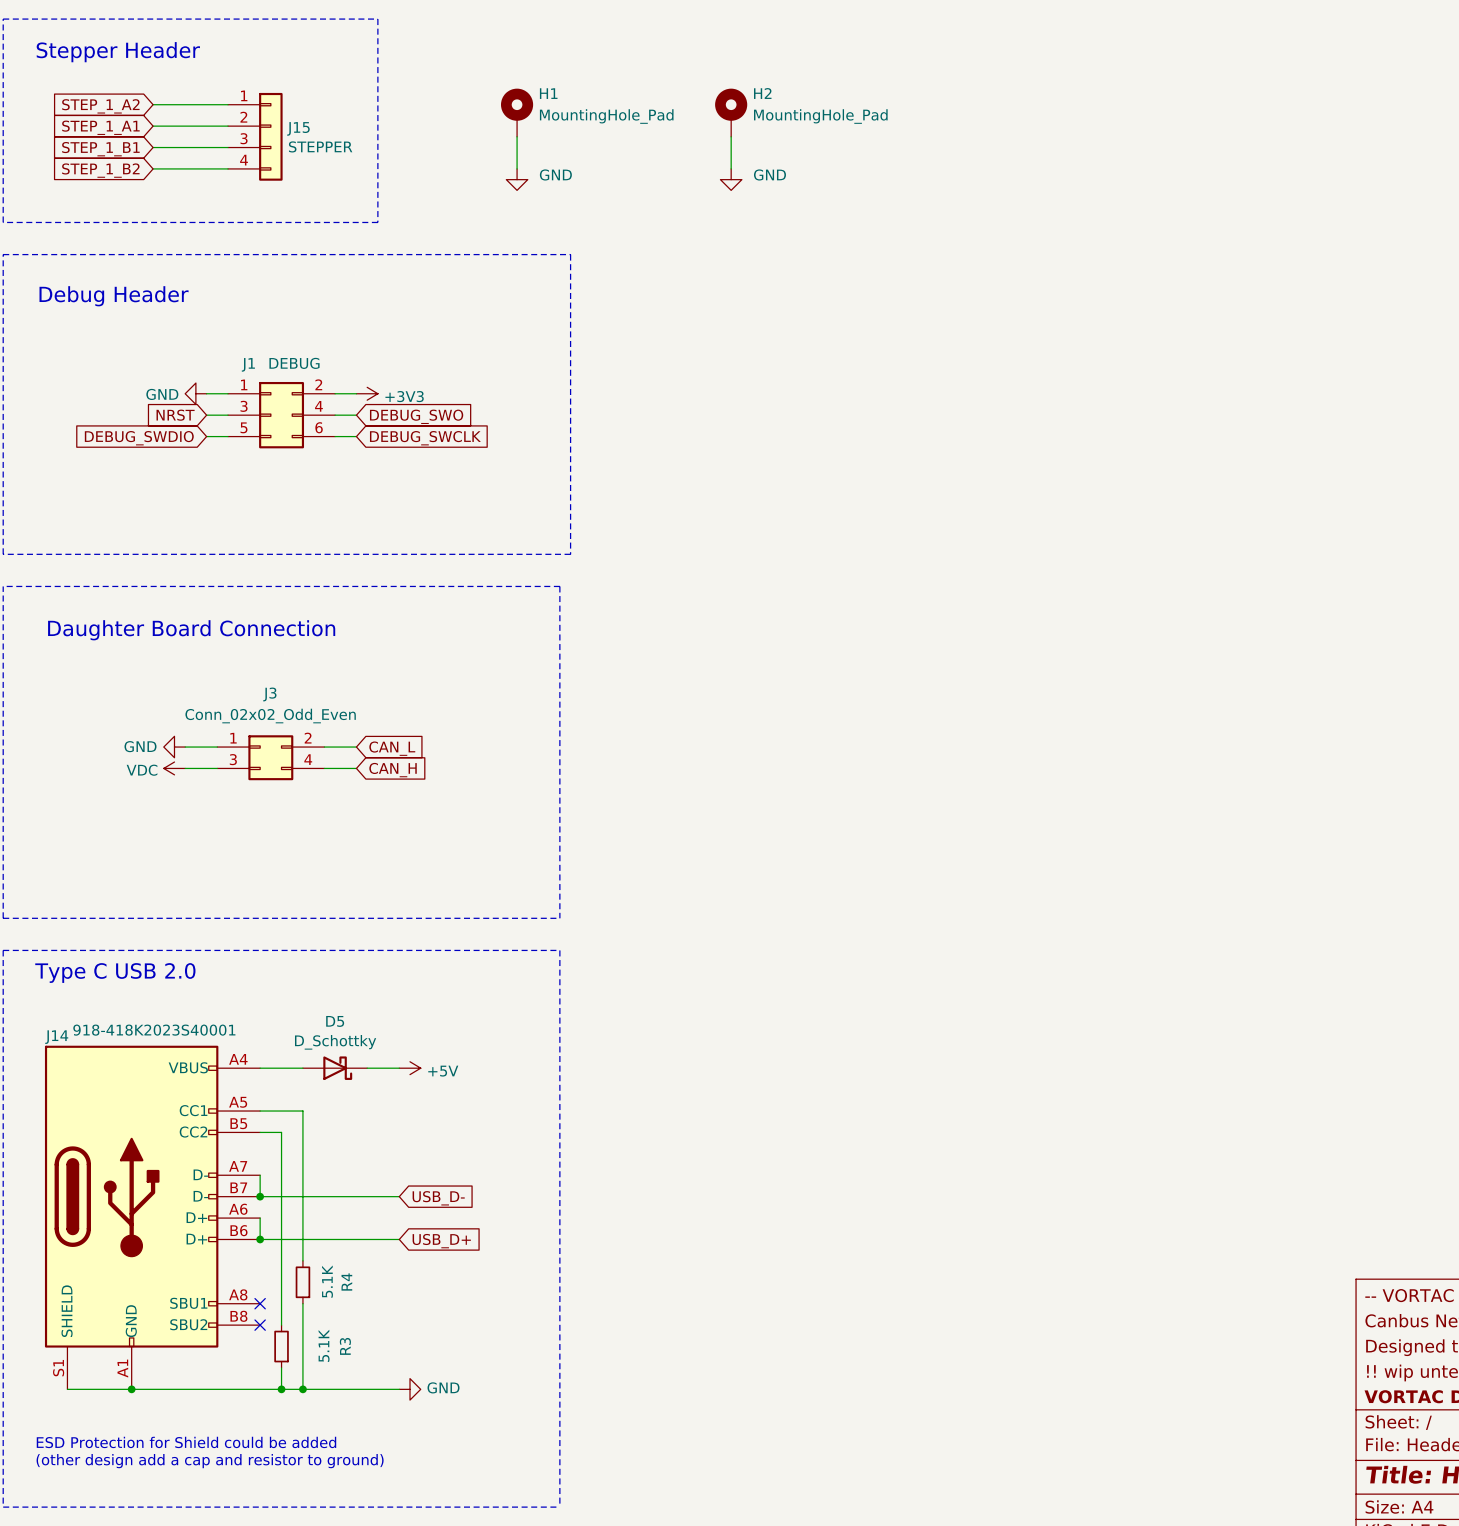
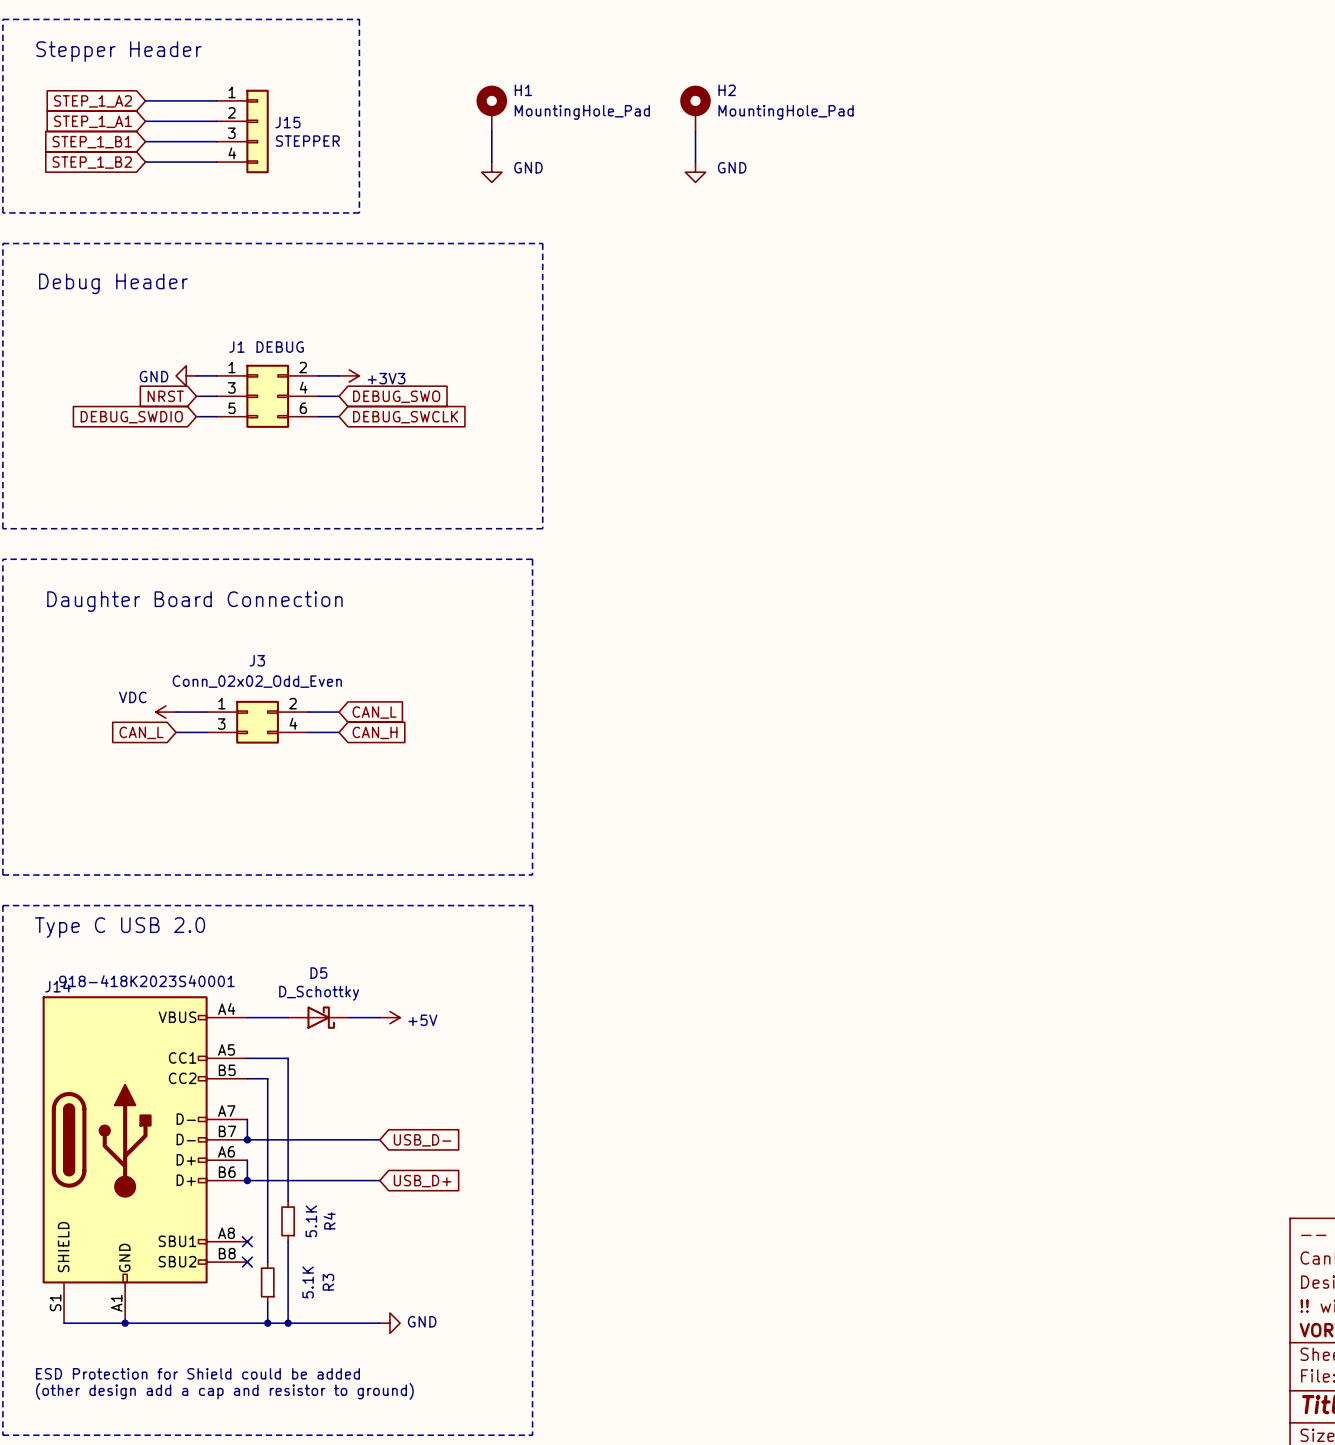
power symbol: GND (174, 747) -> VDC (165, 712)
power symbol: VDC (174, 768) -> none
global label: none -> CAN_L (141, 732)

